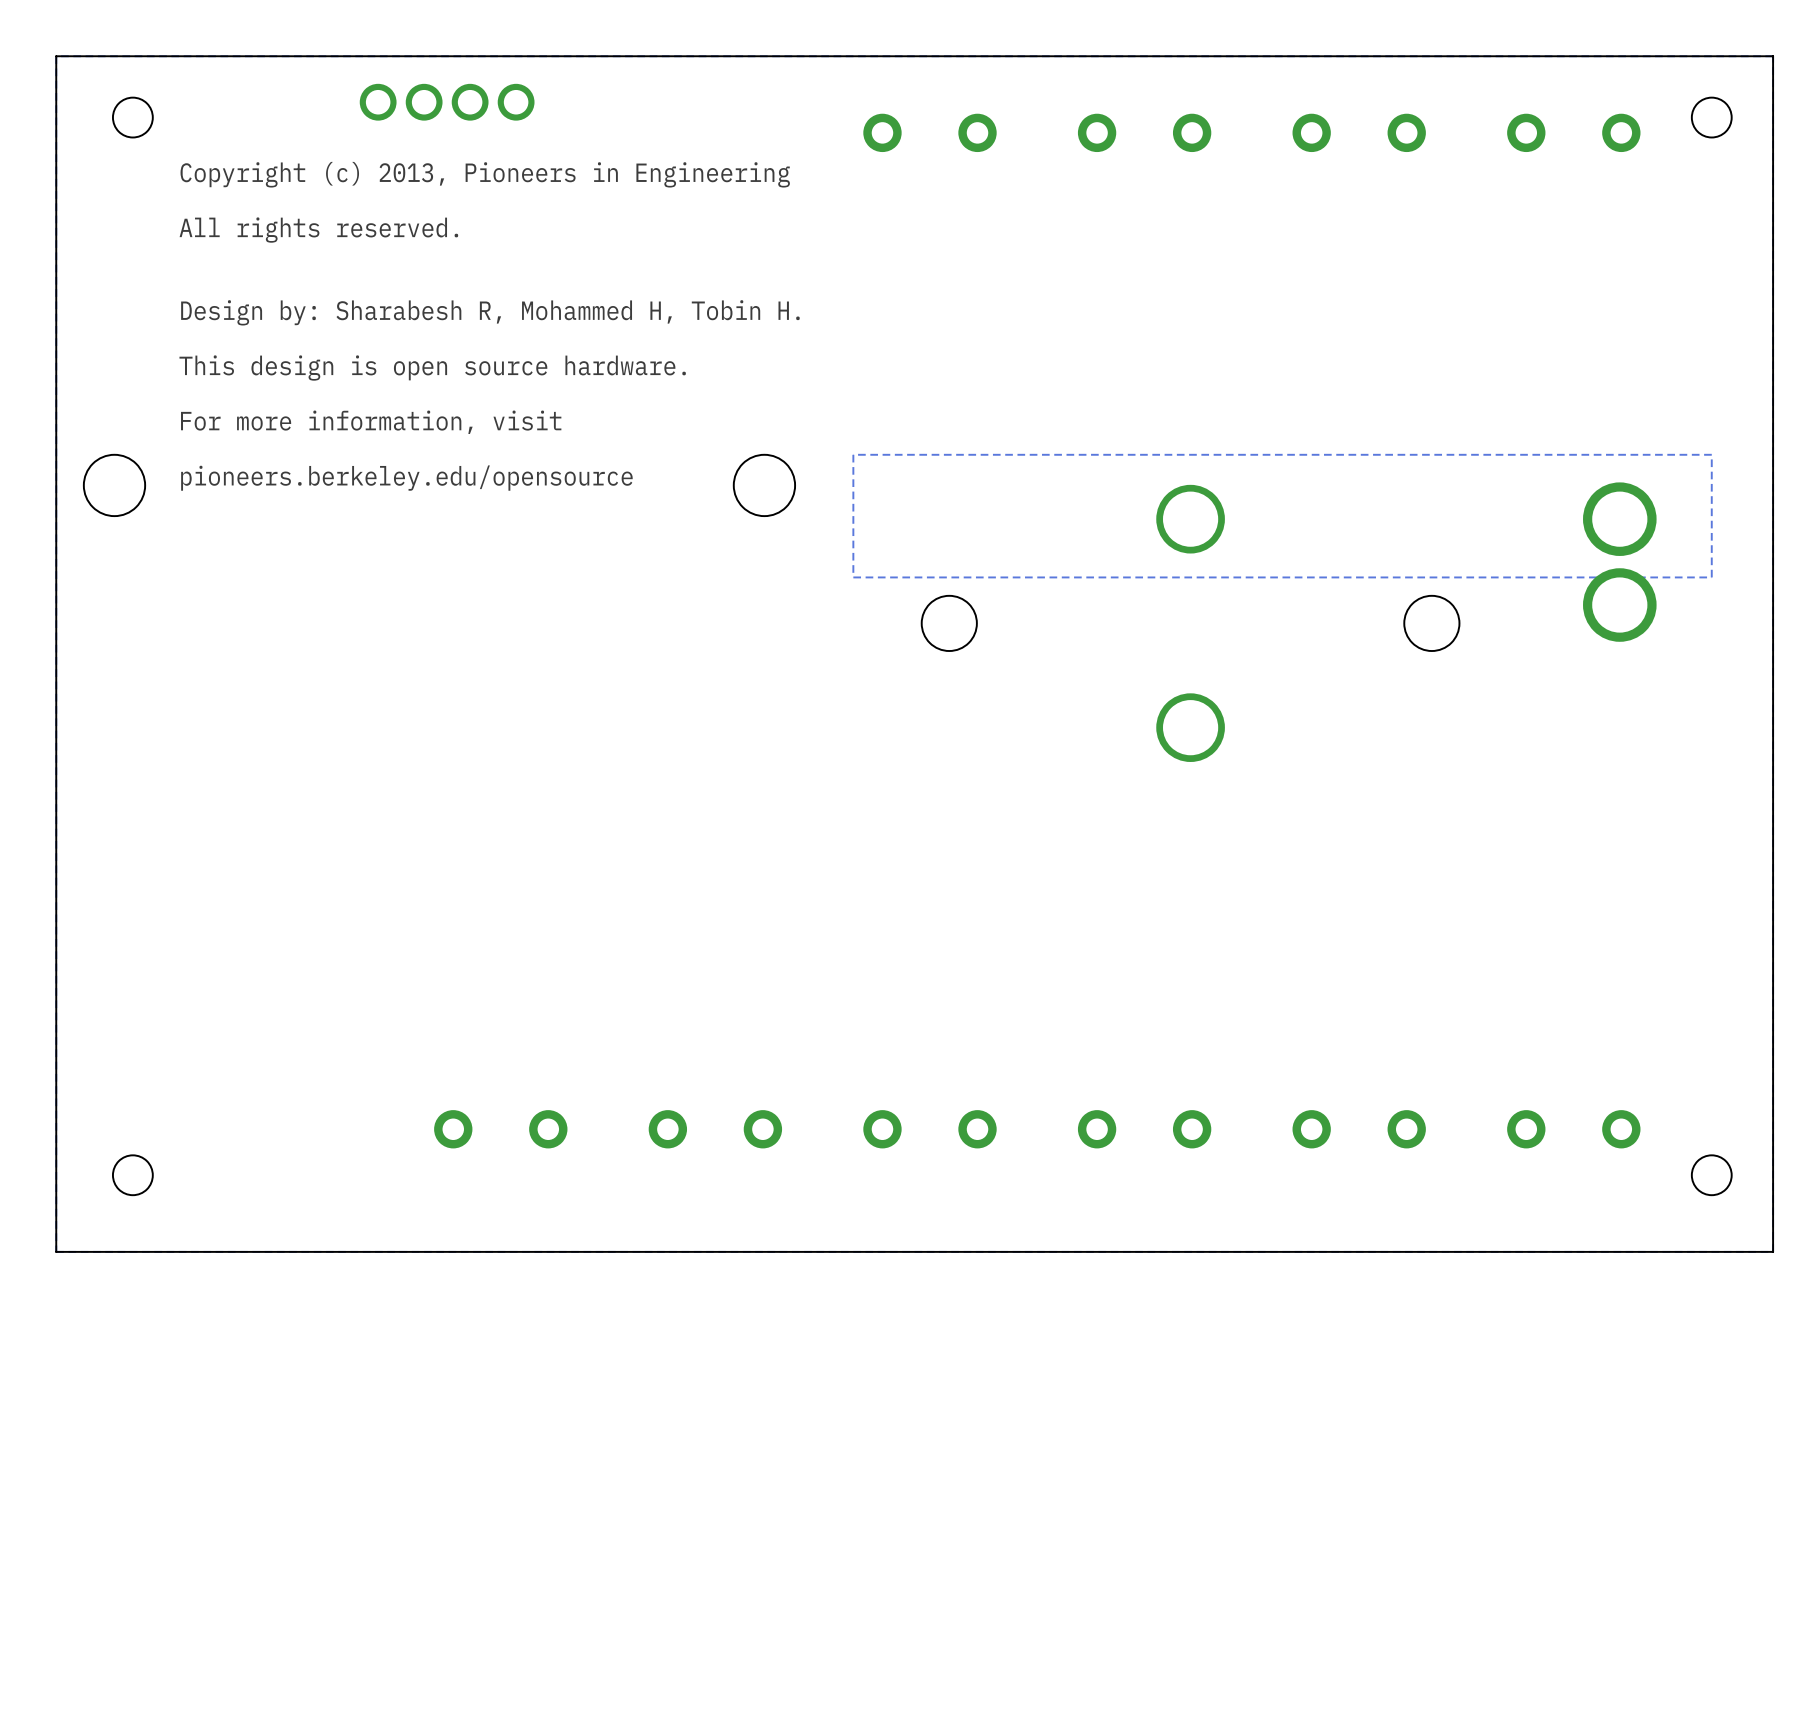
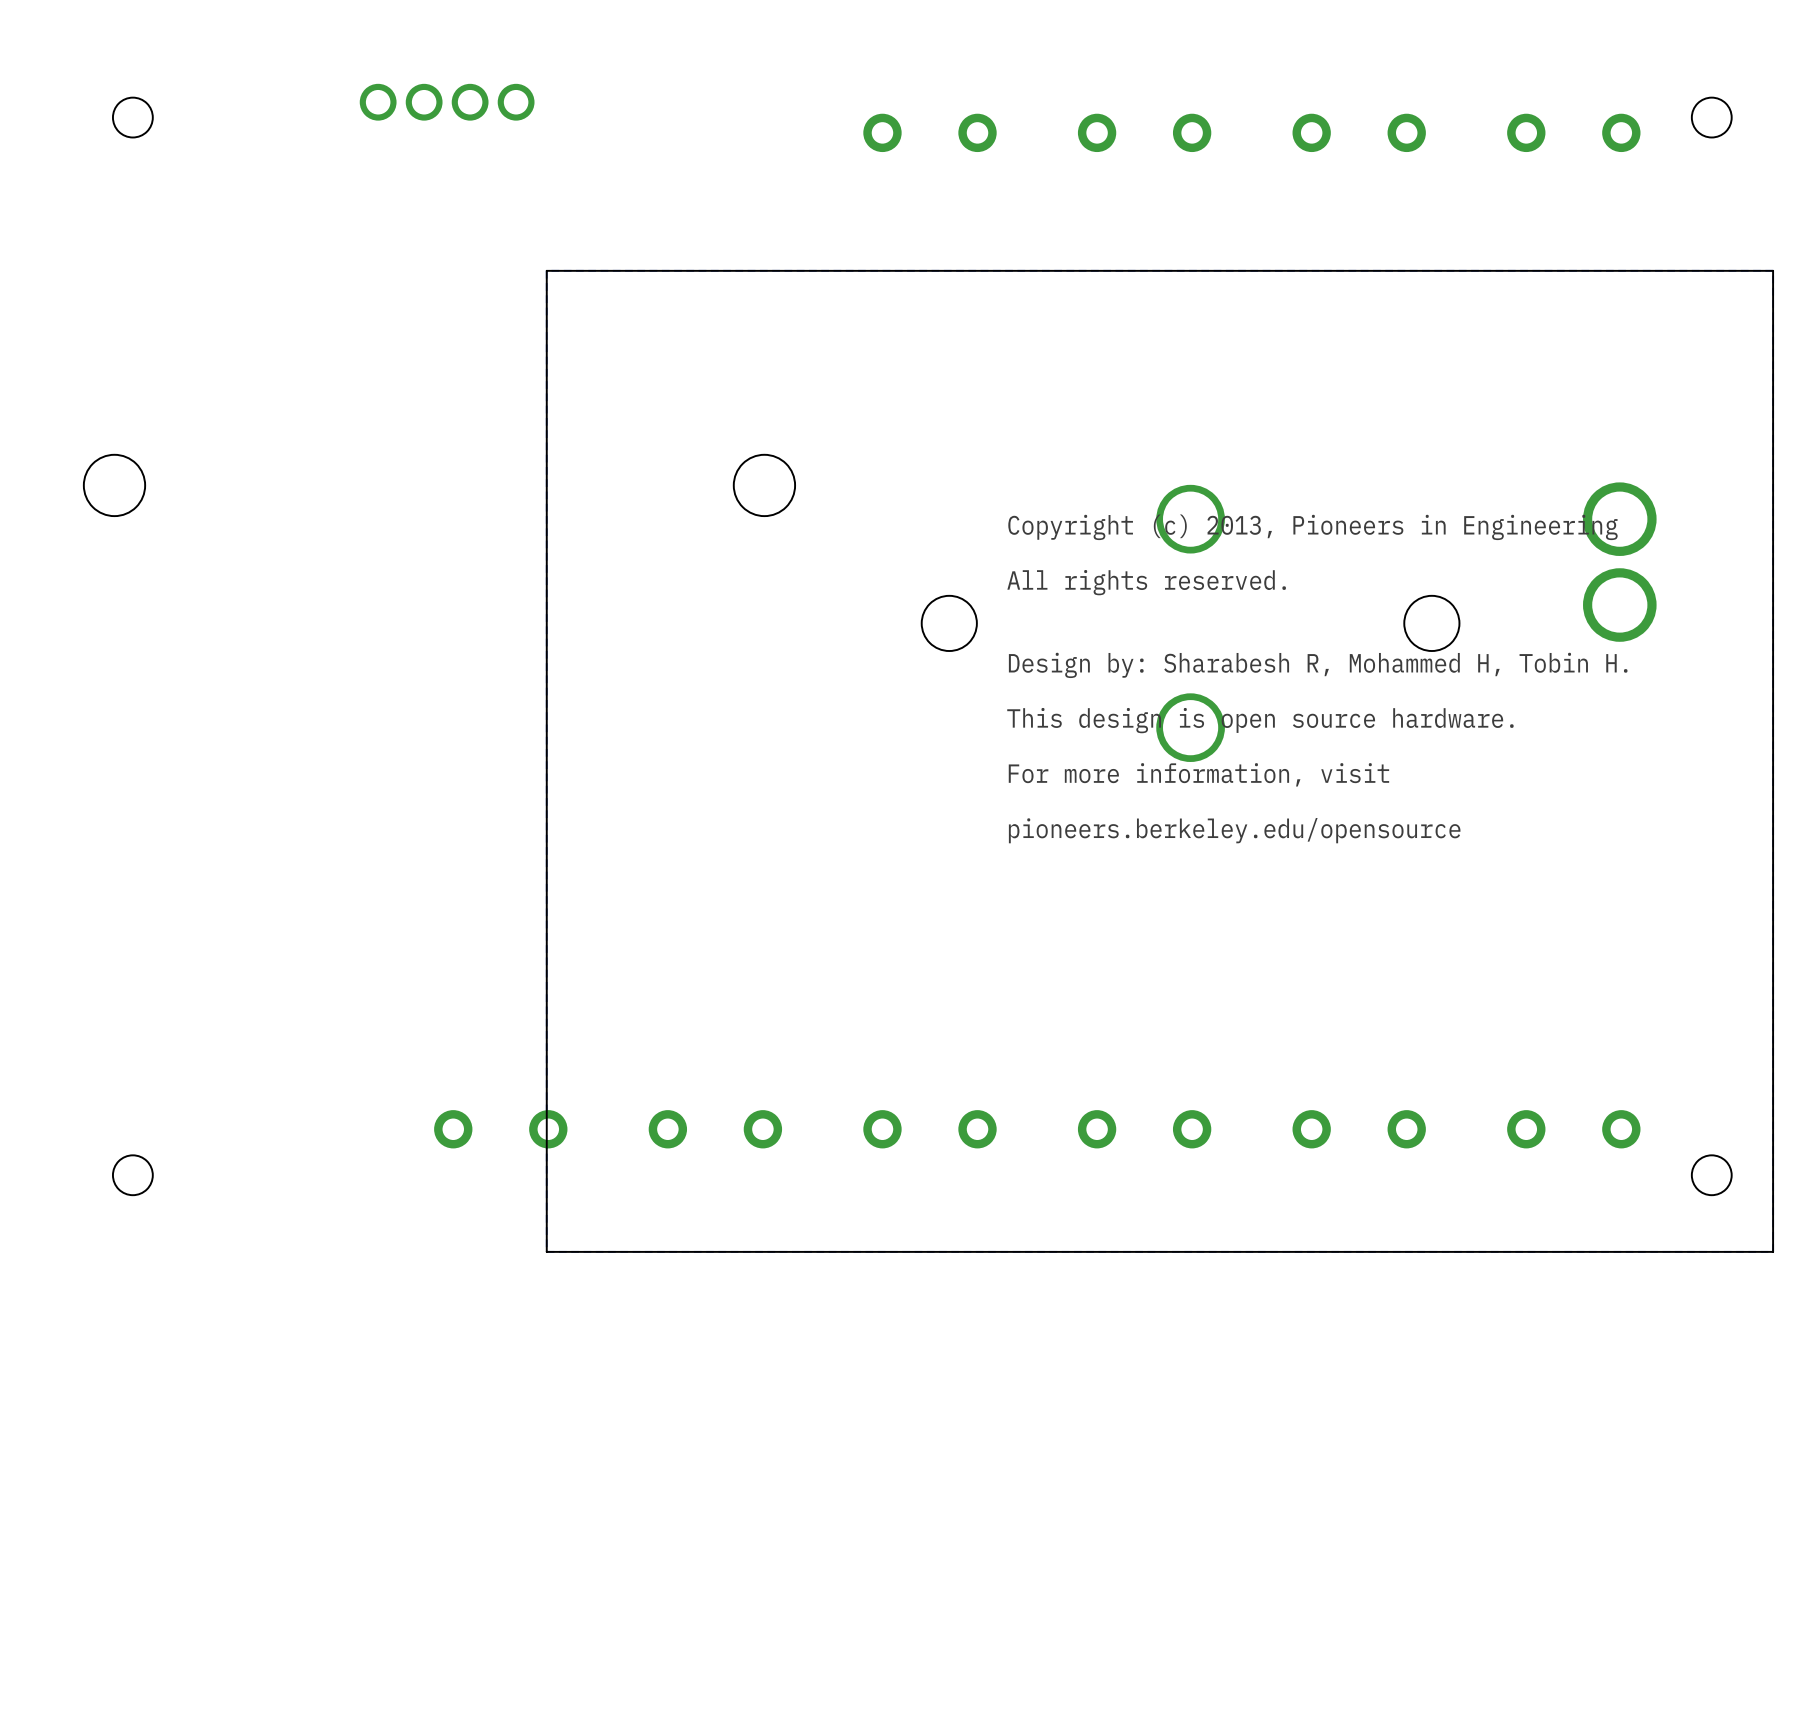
text: Copyright (c) 2013, Pioneers in Engineering (485, 174) -> none
text: All rights reserved. (318, 230) -> none
board edge: (1773, 270) (1773, 56) (56, 56) (56, 1251) (546, 1251) -> (1773, 270) (546, 270) (546, 1251)
text: Design by: Sharabesh R, Mohammed H, Tobin H. (490, 312) -> none
text: This design is open source hardware. (432, 368) -> none
text: For more information, visit (371, 422) -> none
zone outline: (1711, 454) (853, 454) (853, 577) (1711, 577) (1711, 454) -> none
text: pioneers.berkeley.edu/opensource (406, 478) -> none
text: none -> Copyright (c) 2013, Pioneers in Engineering (1312, 527)
text: none -> All rights reserved. (1146, 582)
text: none -> Design by: Sharabesh R, Mohammed H, Tobin H. (1318, 665)
text: none -> This design is open source hardware. (1260, 720)
text: none -> For more information, visit (1198, 774)
text: none -> pioneers.berkeley.edu/opensource (1234, 830)

